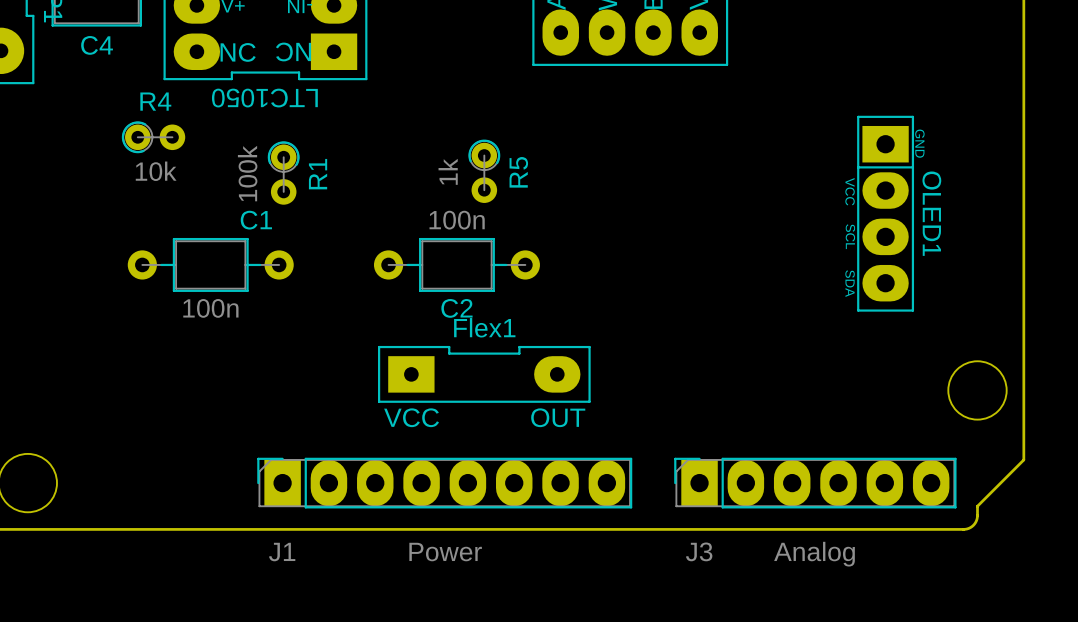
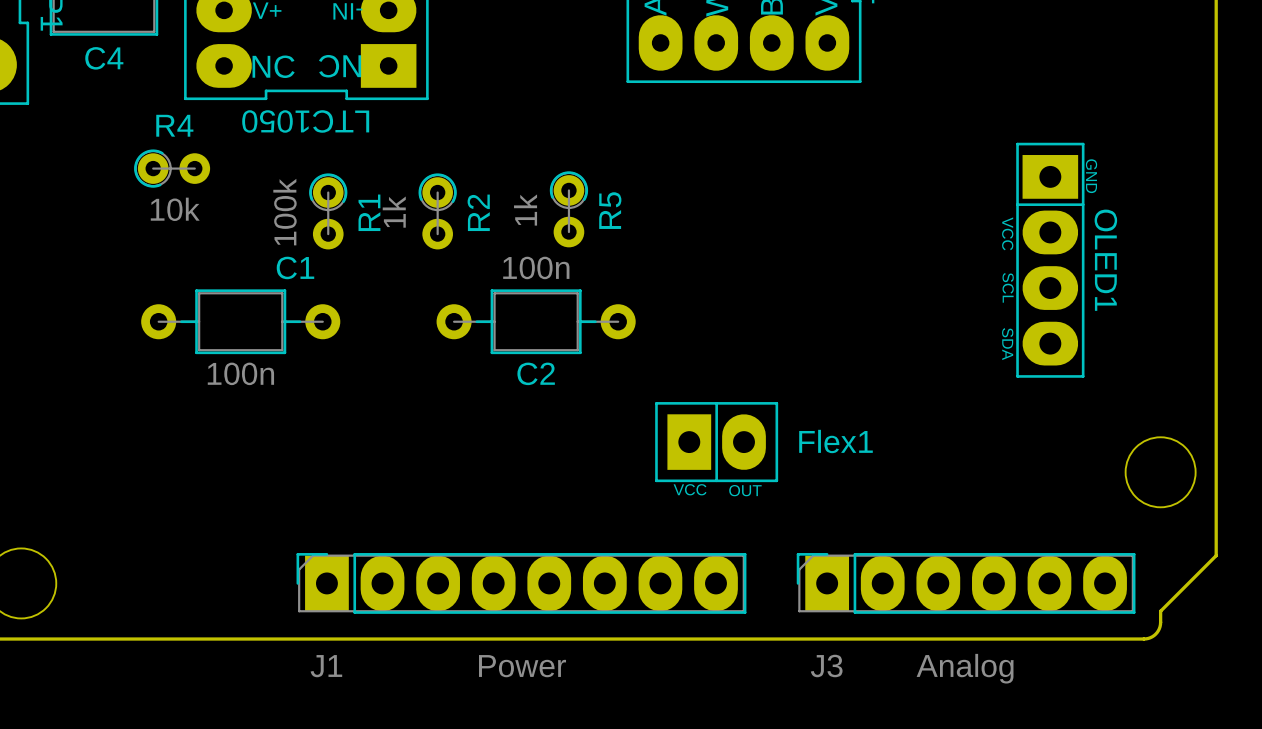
R2: none -> 1k (437, 211)
Flex1 name position: Flex1 (484, 327) -> Flex1 (835, 441)
Flex1 footprint: [377, 345, 591, 403] -> [655, 402, 779, 483]

